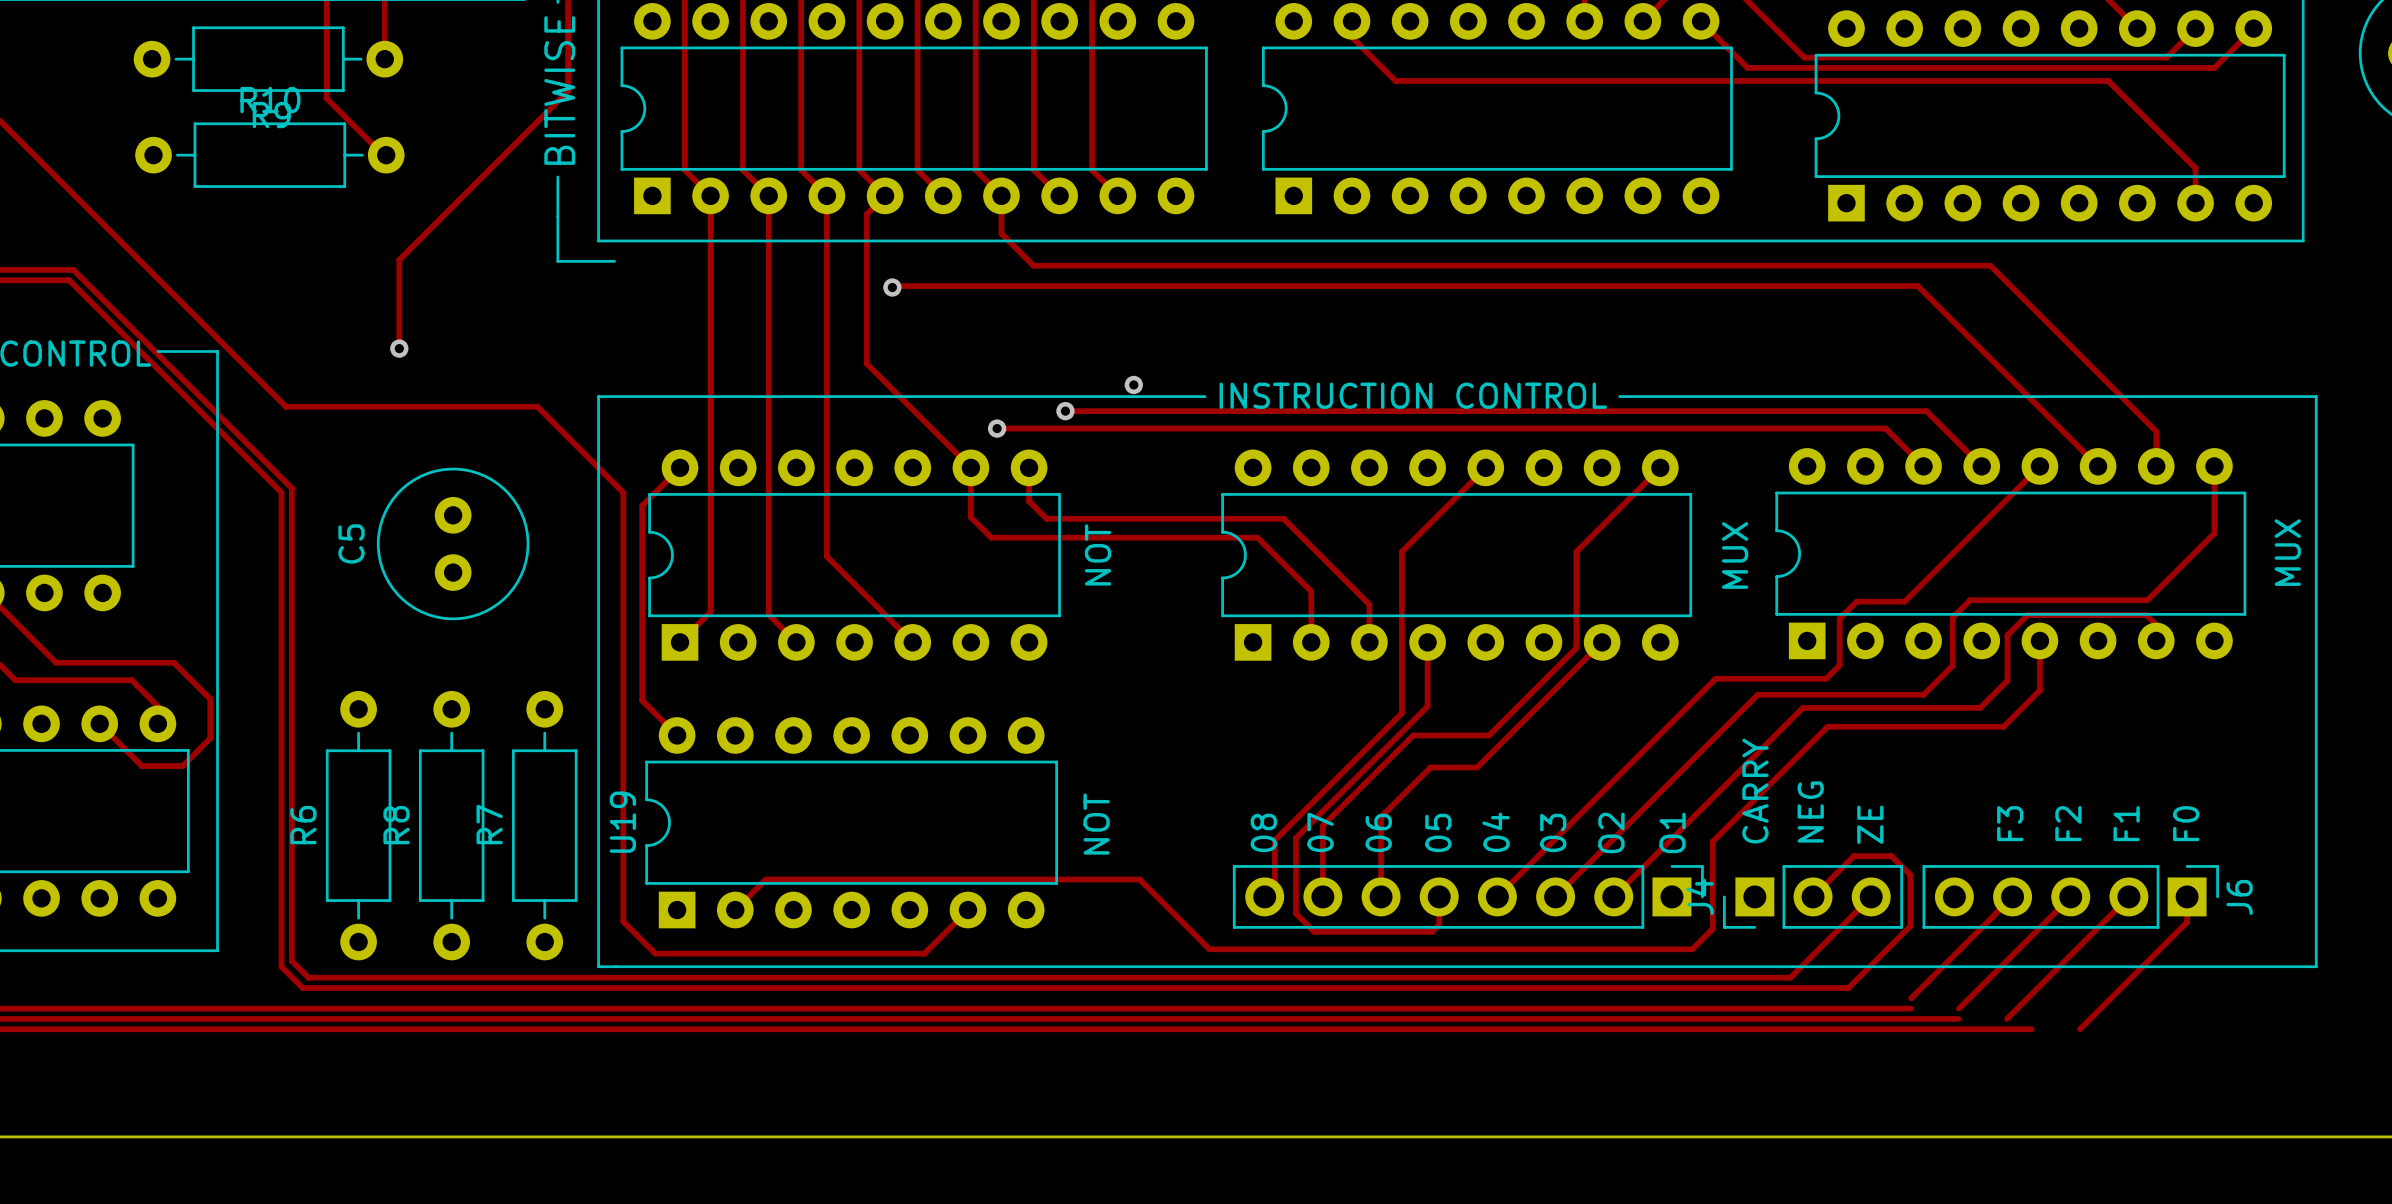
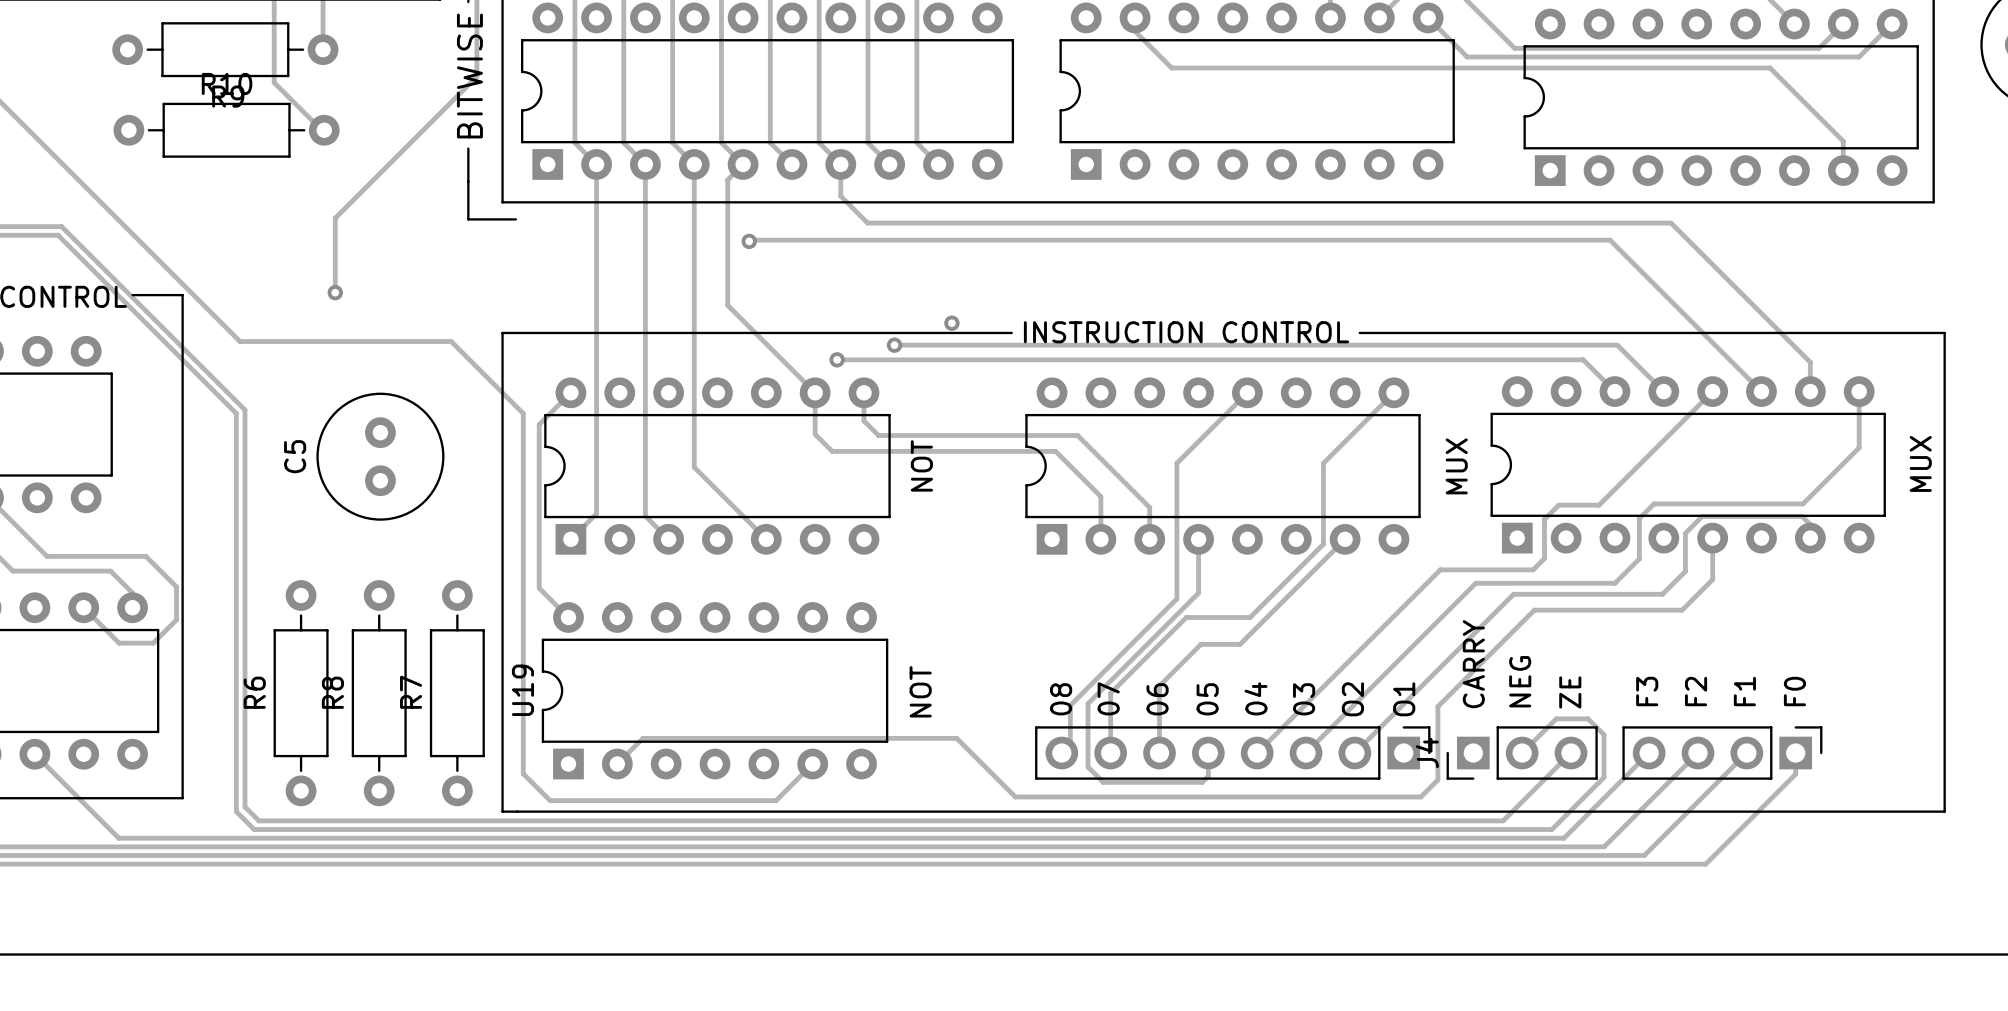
text: none -> F3 (1647, 691)
text: F3 (2010, 823) -> F2 (1696, 691)
text: F2 (2068, 823) -> F1 (1744, 691)
text: F1 (2126, 823) -> F0 (1794, 691)
text: F0 (2186, 823) -> none
track: none -> (1649, 753) (1564, 838) (118, 838) (34, 754)
track: (2012, 896) (1911, 998) -> none
part: none -> (1722, 753)
track: (2070, 896) (1959, 1008) -> (1698, 753) (1604, 846)
J6: (2070, 896) -> none
track: (2128, 896) (2006, 1018) -> (1746, 753) (1644, 855)
track: (2187, 896) (2187, 922) (2079, 1029) -> (1795, 753) (1795, 774) (1705, 864)

